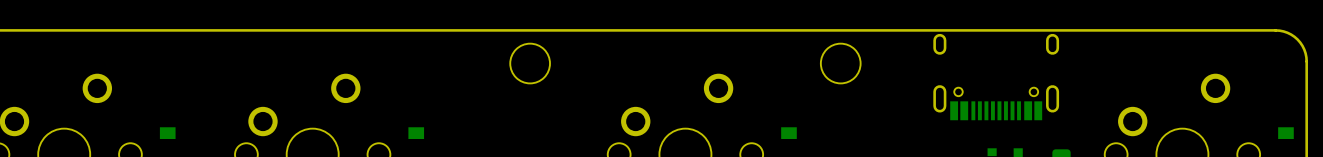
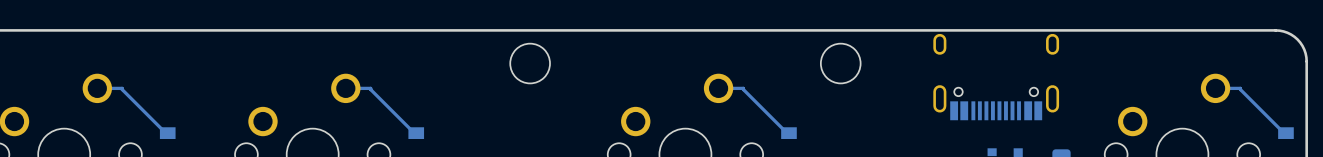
bottom track: none -> (97, 88) (122, 88) (167, 133)
bottom track: none -> (345, 88) (370, 88) (416, 133)
bottom track: none -> (718, 88) (743, 88) (788, 133)
bottom track: none -> (1215, 88) (1240, 88) (1285, 133)

